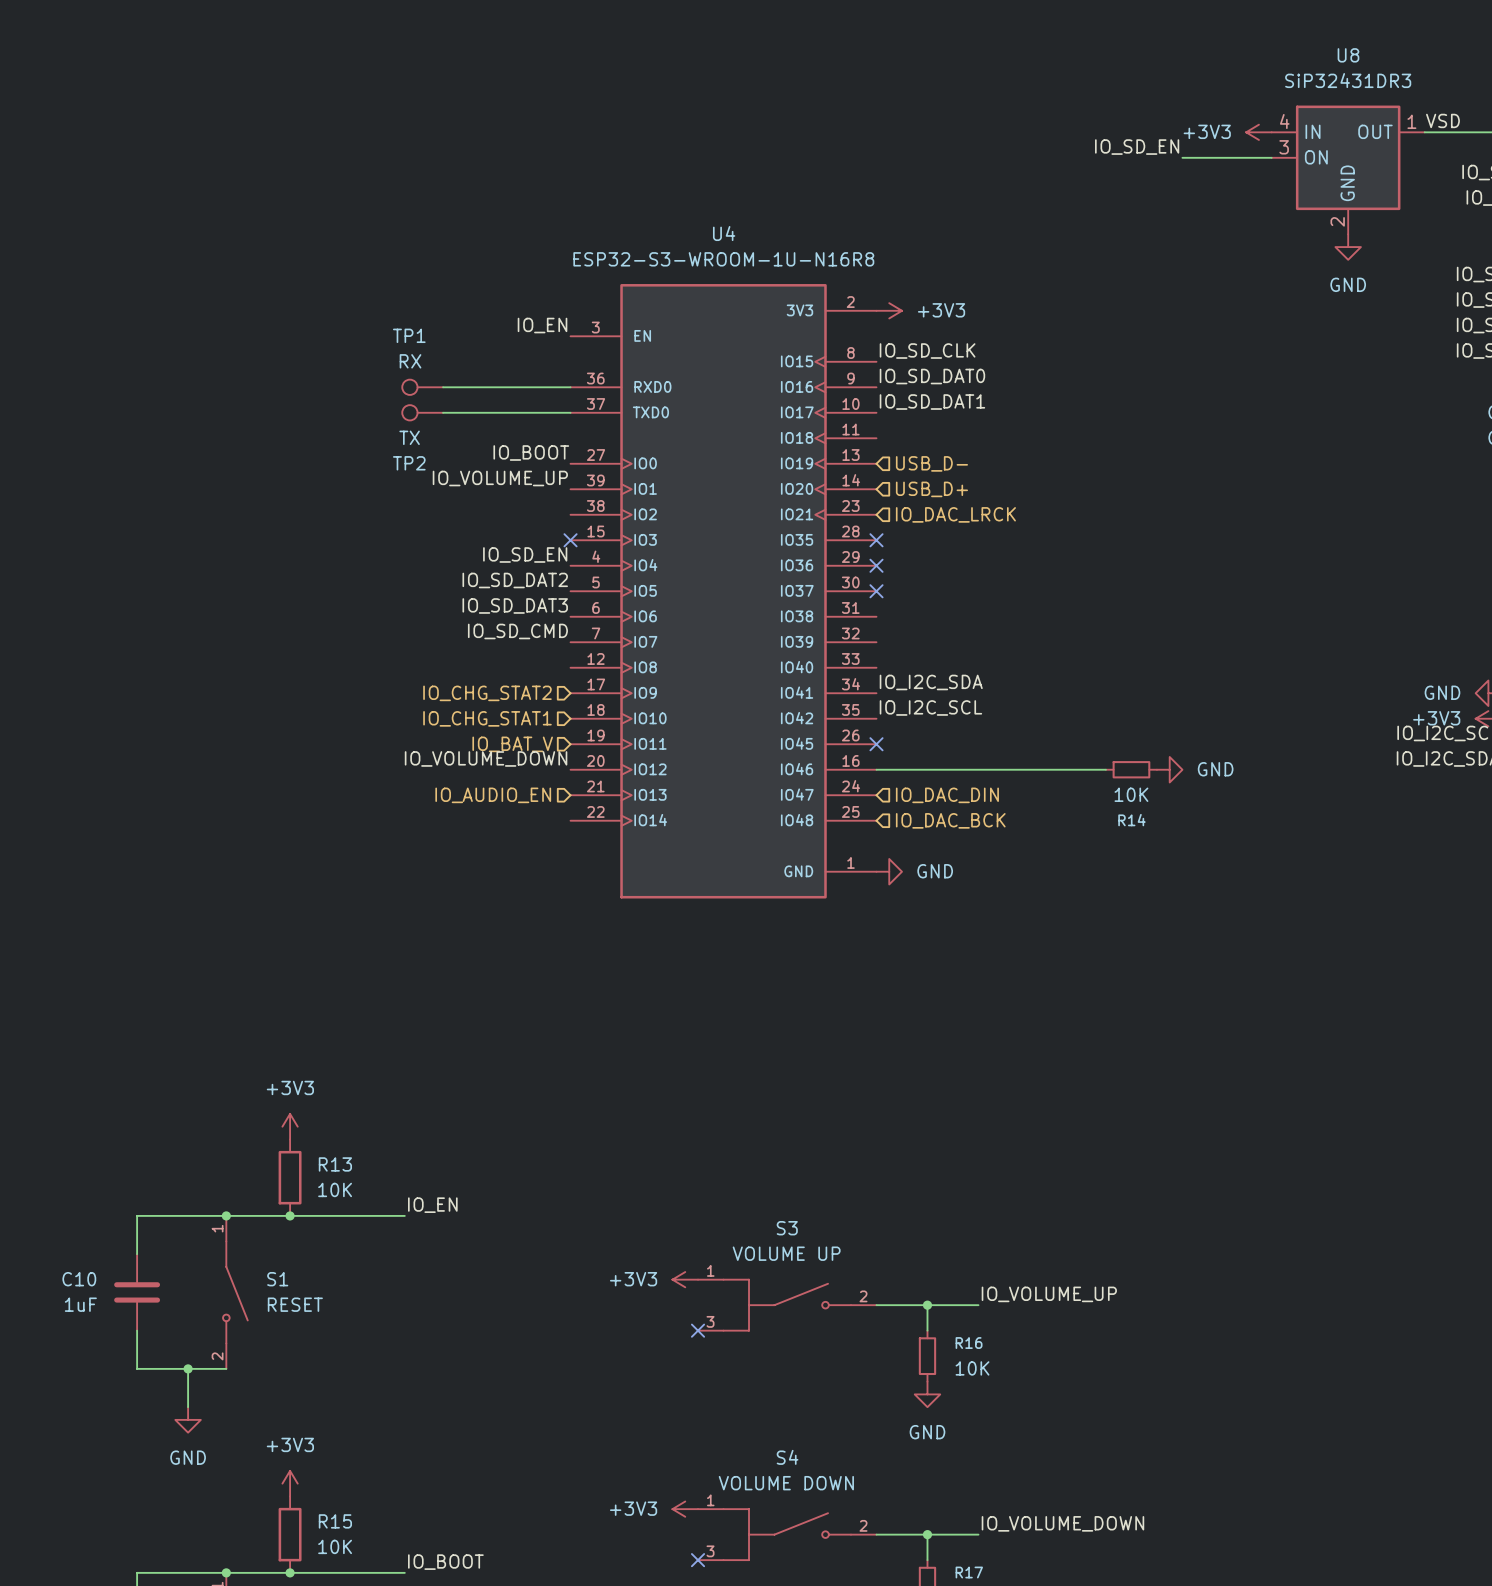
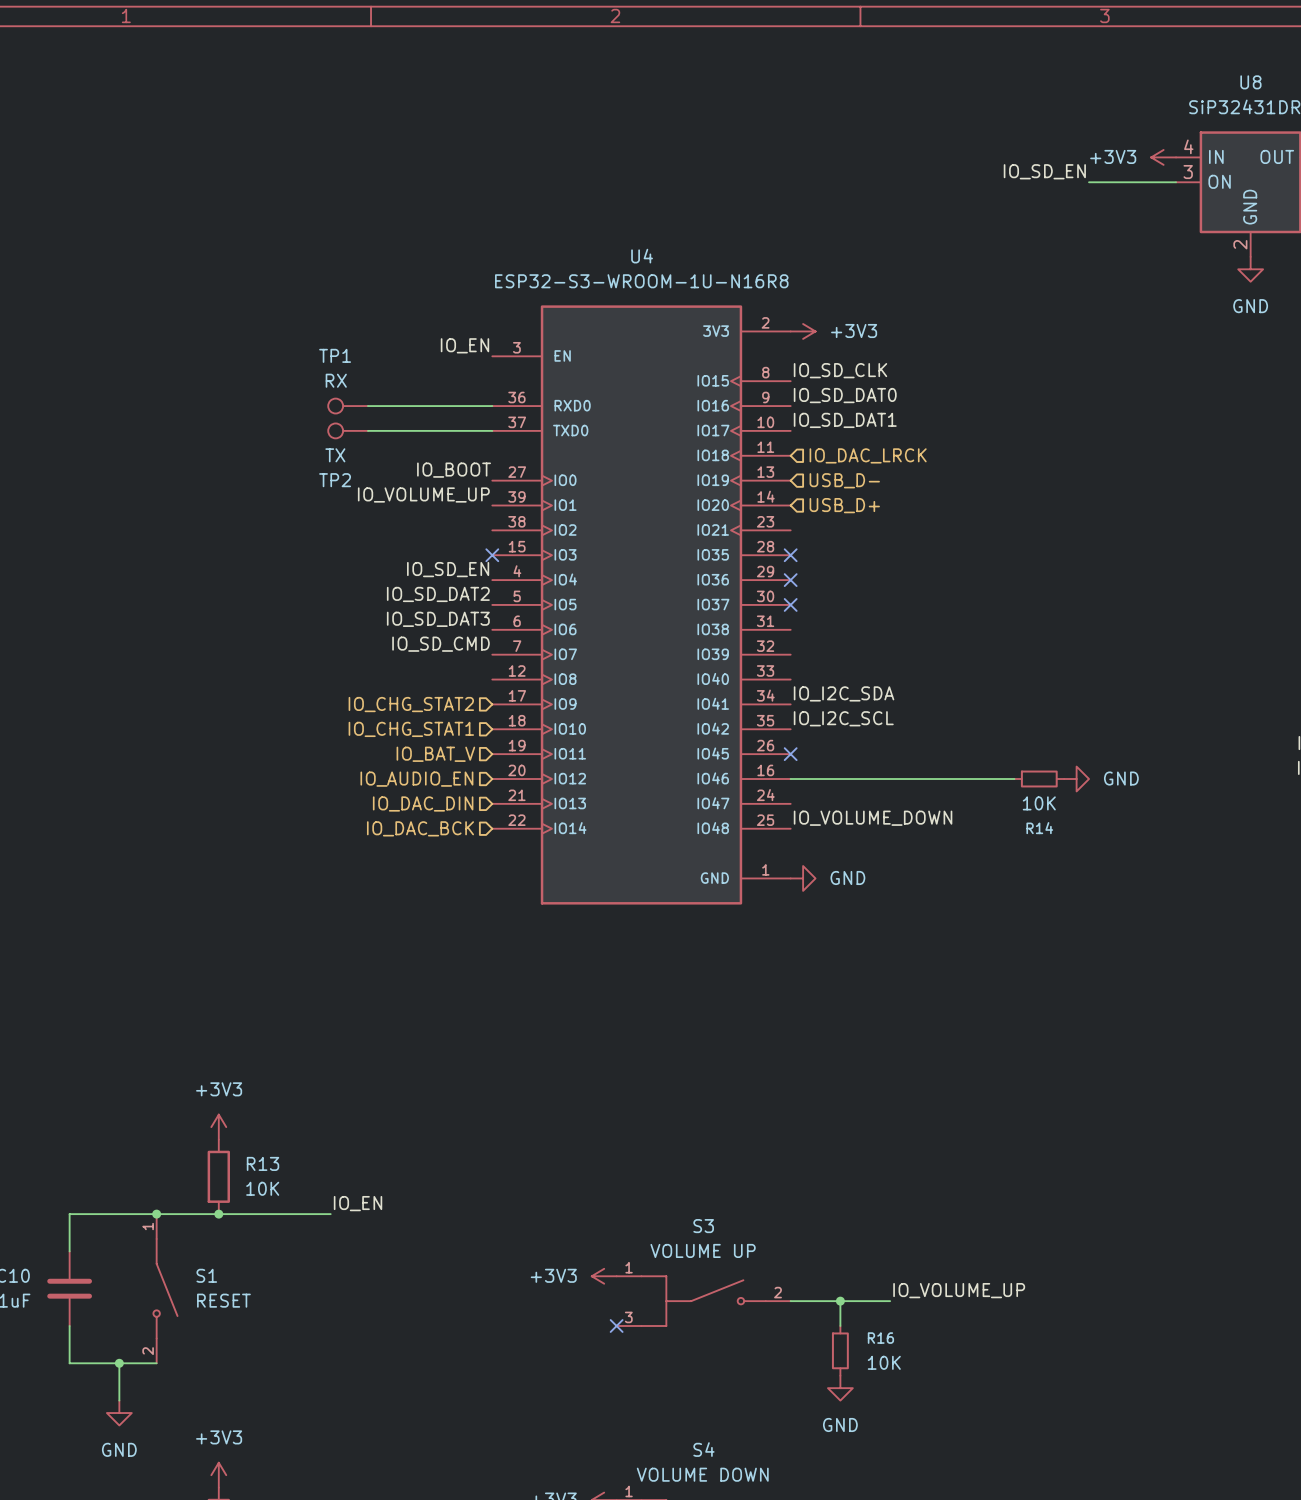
hierarchical label position: IO_DAC_LRCK (955, 514) -> IO_DAC_LRCK (868, 455)
label: IO_VOLUME_DOWN (486, 758) -> none
hierarchical label: none -> IO_AUDIO_EN (416, 779)
hierarchical label: IO_AUDIO_EN (493, 795) -> IO_DAC_DIN (423, 803)
hierarchical label: IO_DAC_DIN (947, 795) -> none
label: none -> IO_VOLUME_DOWN (873, 818)
hierarchical label: none -> IO_DAC_BCK (420, 828)
hierarchical label: IO_DAC_BCK (950, 820) -> none

